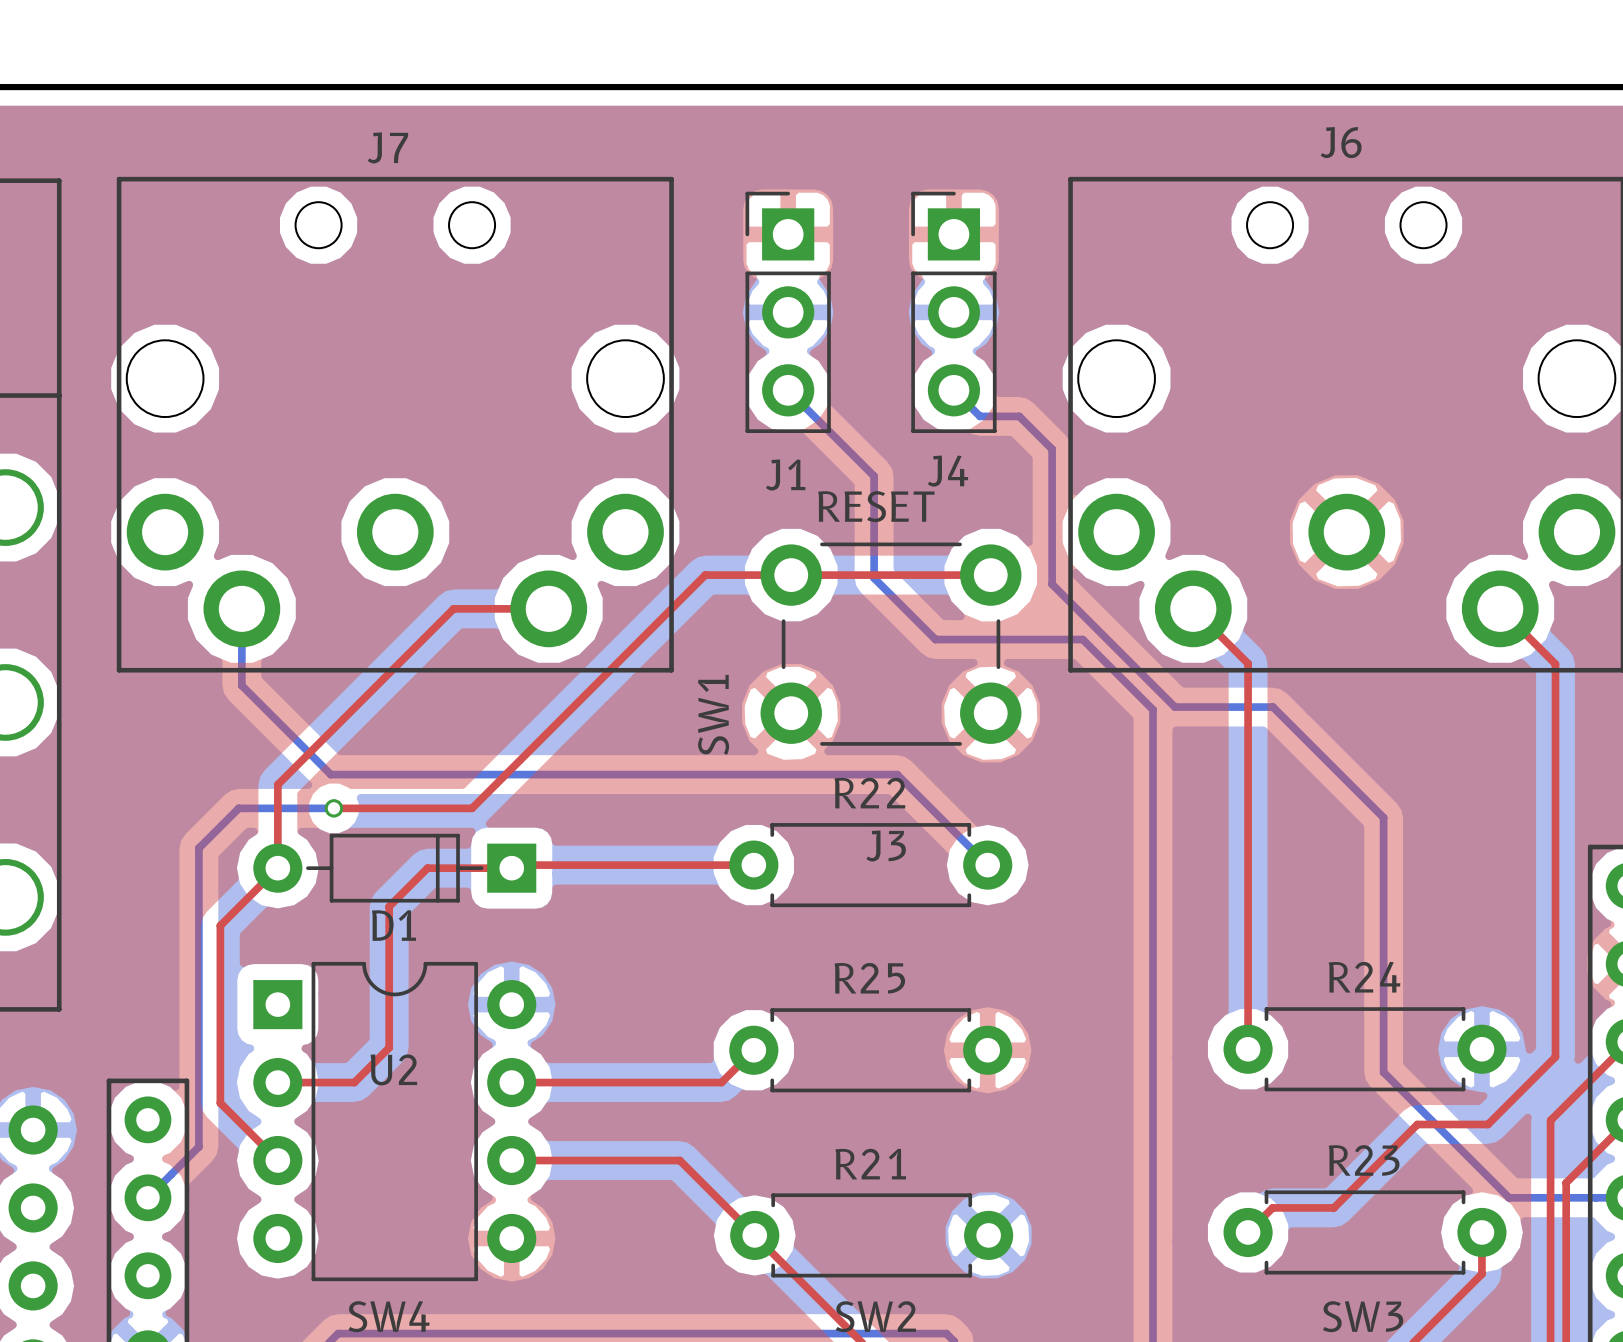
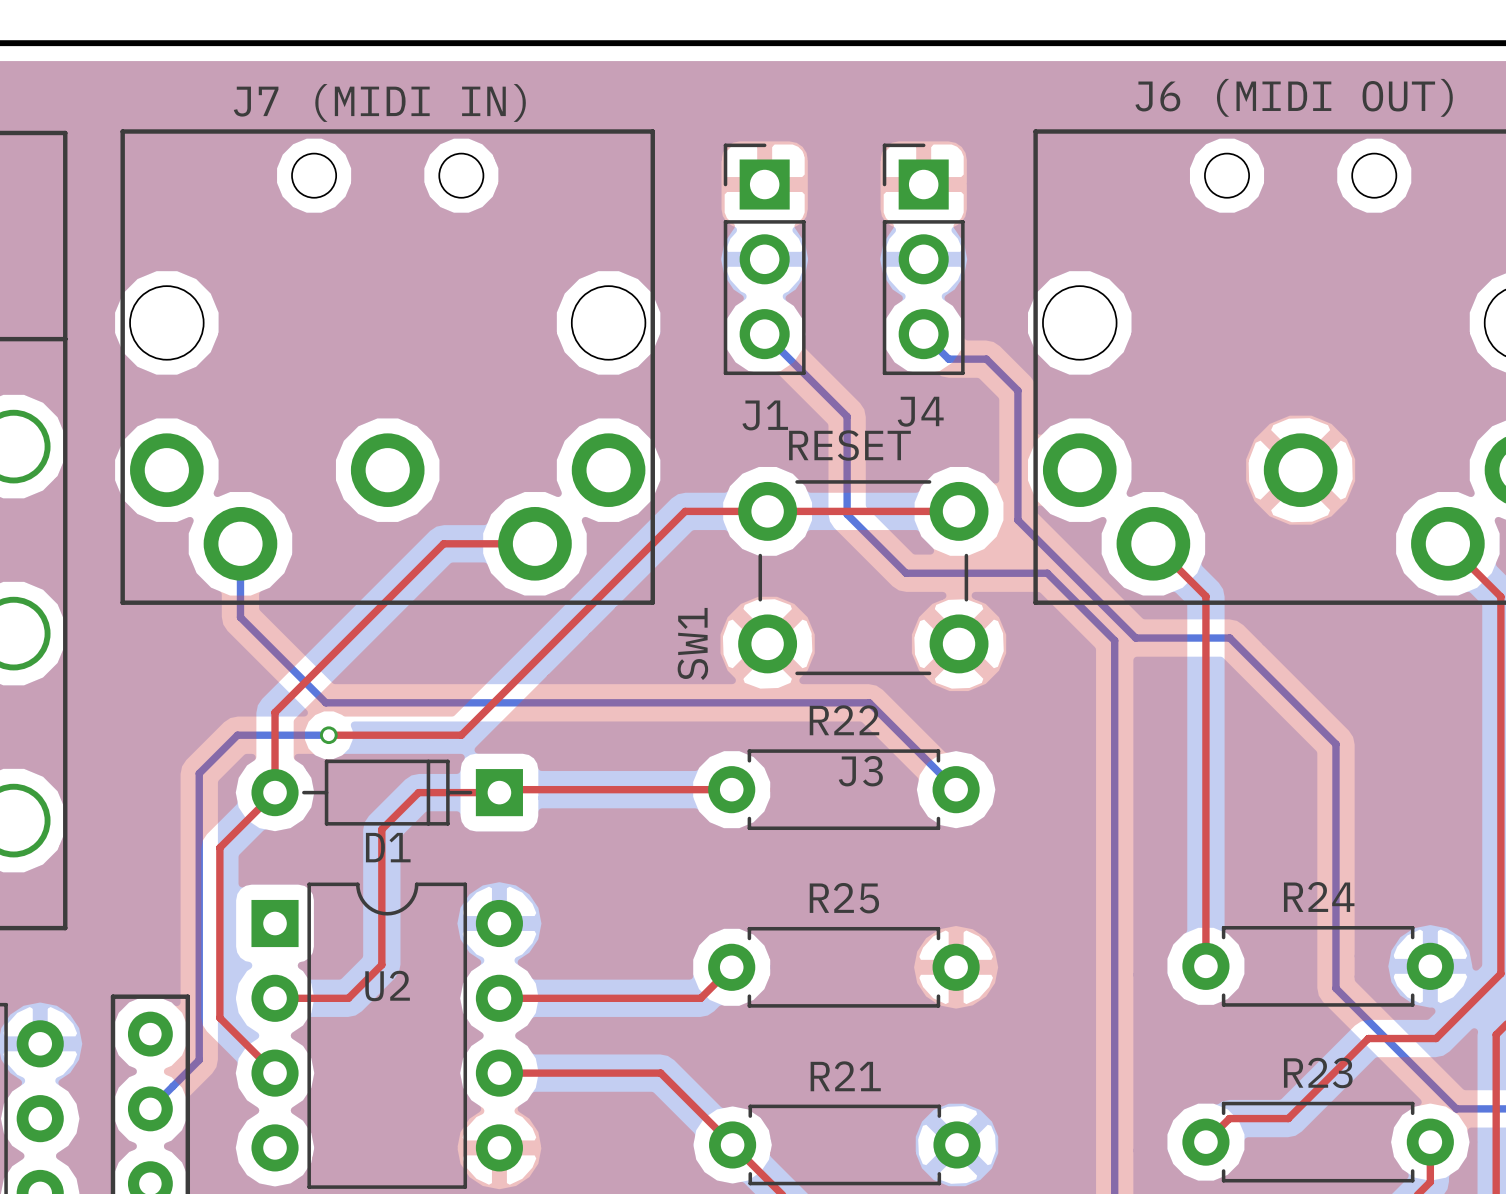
J6 name: J6 (1341, 142) -> J6 (MIDI OUT) (1294, 97)
J7 name: J7 (387, 147) -> J7 (MIDI IN) (379, 102)

